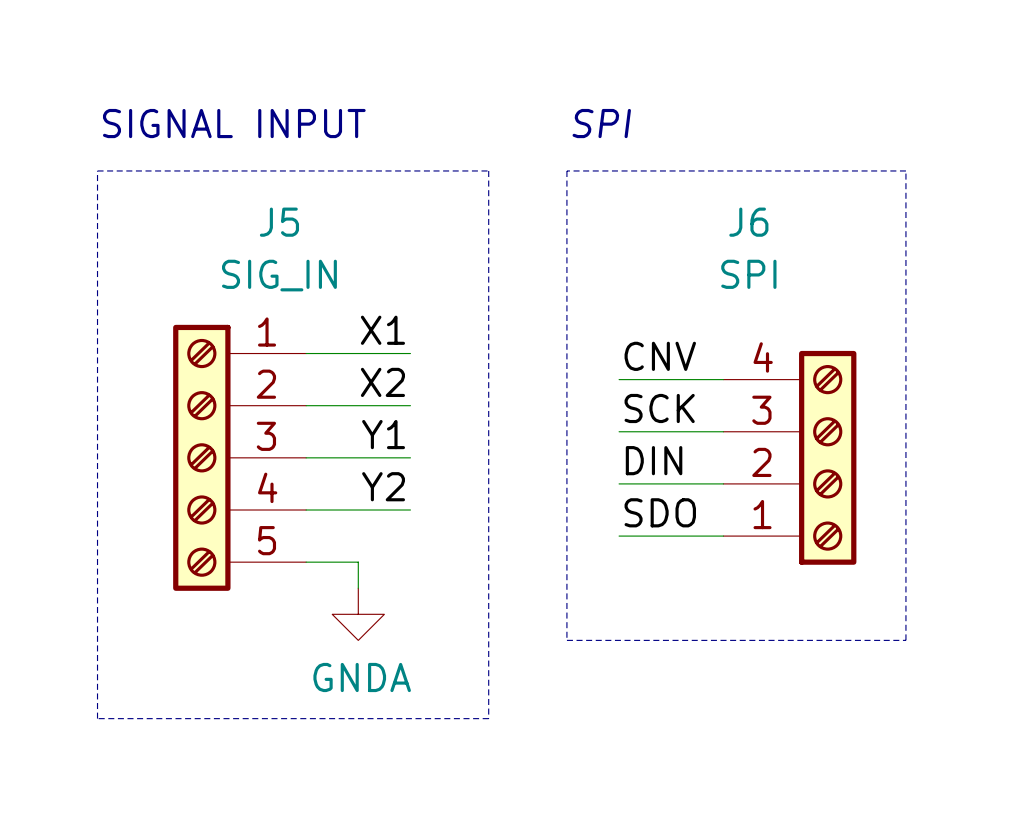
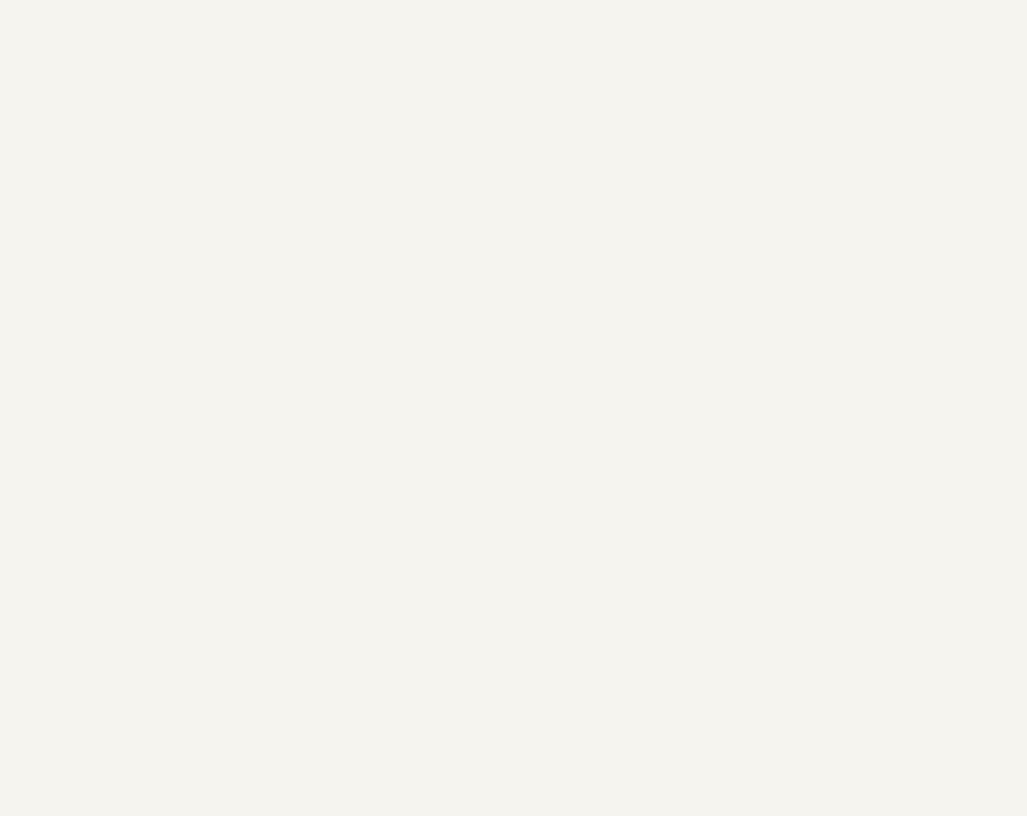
text: SIGNAL INPUT (234, 123) -> none
text: SPI (601, 123) -> none
line: (97, 170) (488, 170) (488, 718) (97, 718) (97, 170) -> none
line: (566, 170) (905, 170) (905, 640) (566, 640) (566, 170) -> none
label: X1 (382, 330) -> none
wire: (306, 353) (410, 353) -> none
label: CNV (660, 356) -> none
wire: (619, 379) (723, 379) -> none
label: X2 (382, 382) -> none
wire: (306, 405) (410, 405) -> none
label: SCK (659, 408) -> none
wire: (619, 431) (723, 431) -> none
label: Y1 (383, 434) -> none
J5: SIG_IN (239, 457) -> none
wire: (306, 457) (410, 457) -> none
J6: SPI (789, 457) -> none
label: DIN (654, 460) -> none
wire: (619, 483) (723, 483) -> none
label: Y2 (383, 486) -> none
wire: (306, 510) (410, 510) -> none
label: SDO (660, 512) -> none
wire: (619, 536) (723, 536) -> none
wire: (306, 562) (358, 562) (358, 588) -> none
power symbol: GNDA (358, 614) -> none

